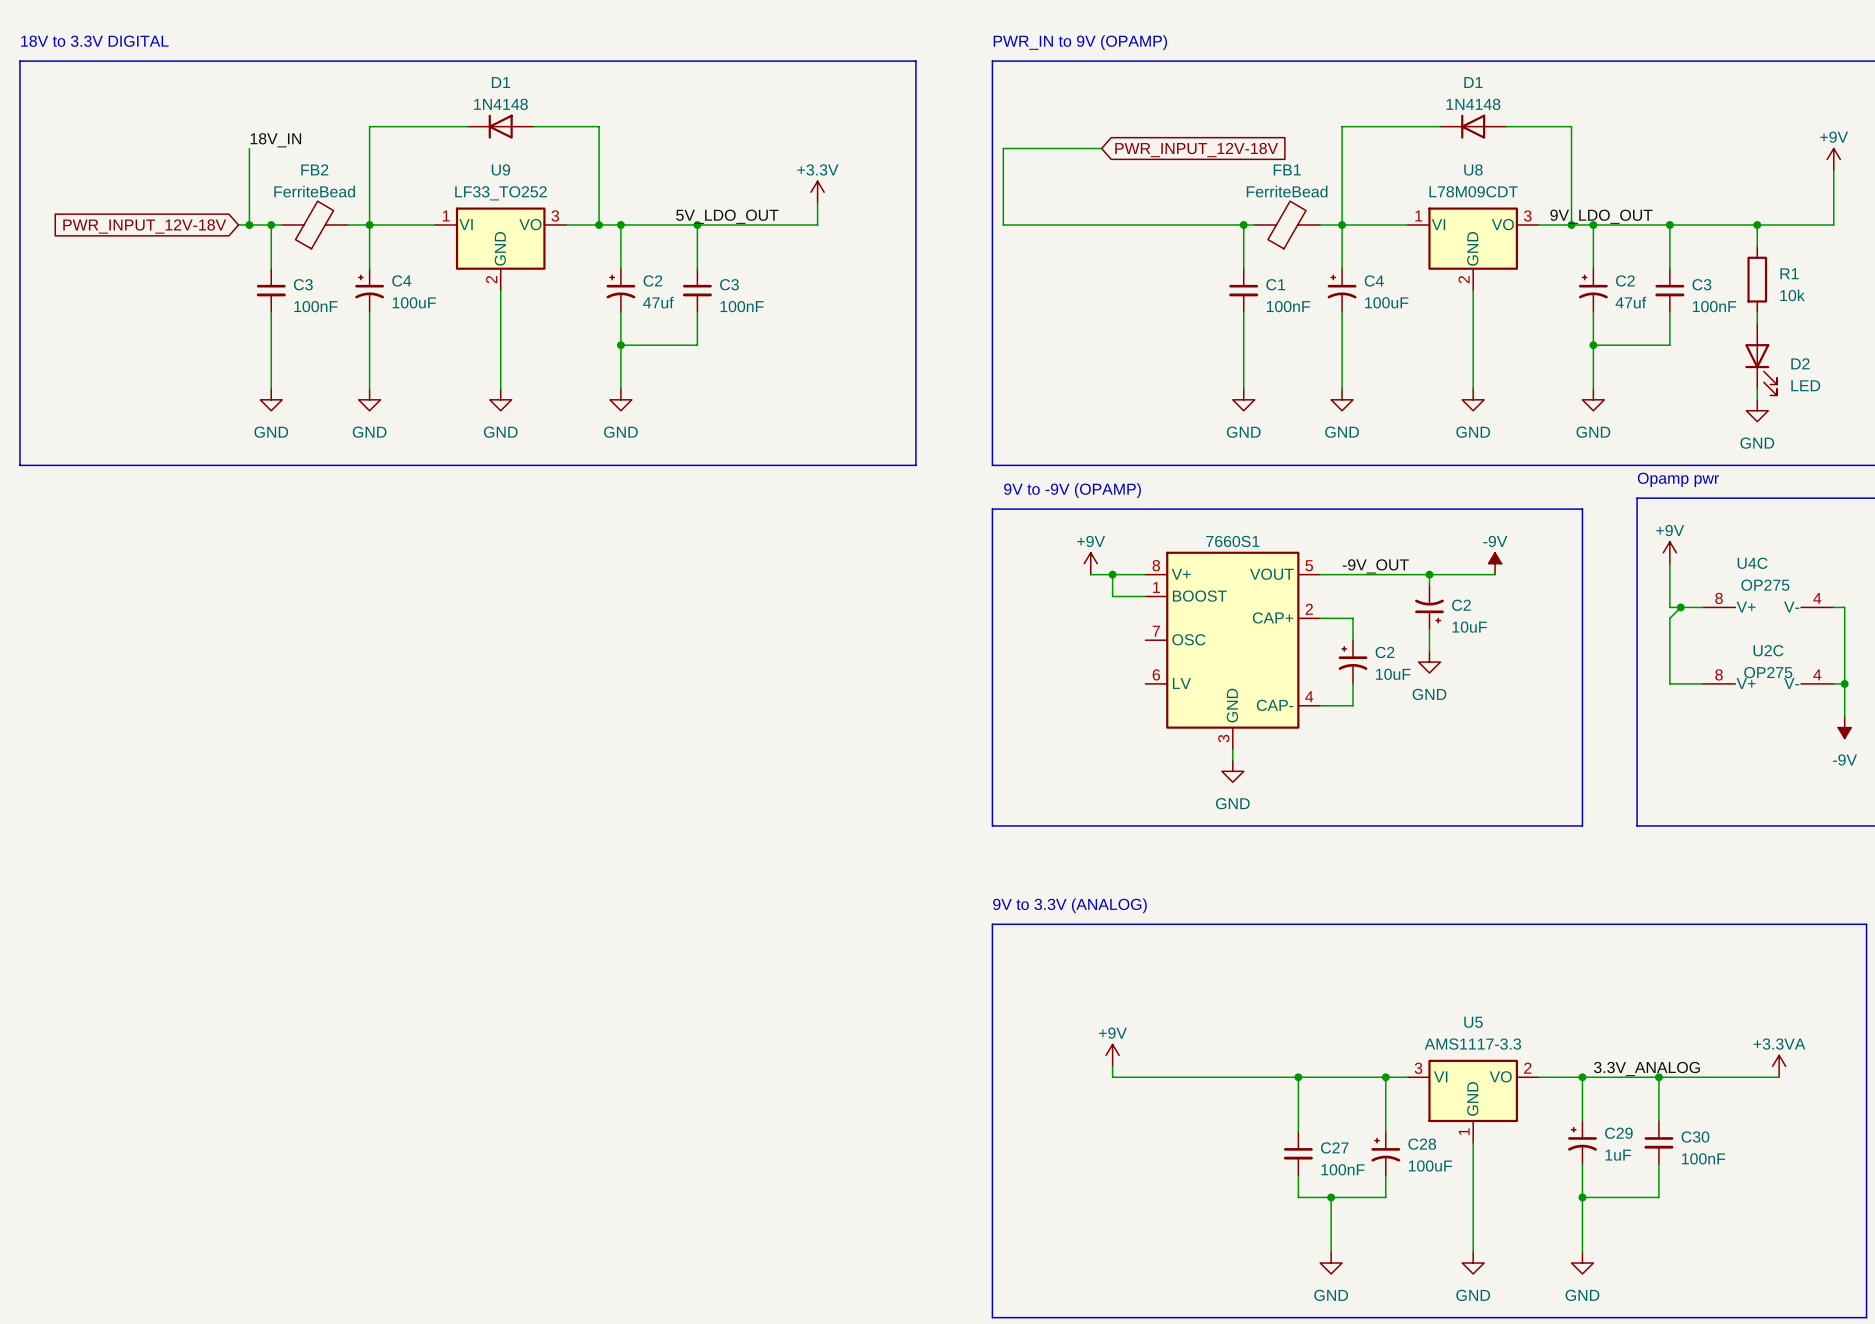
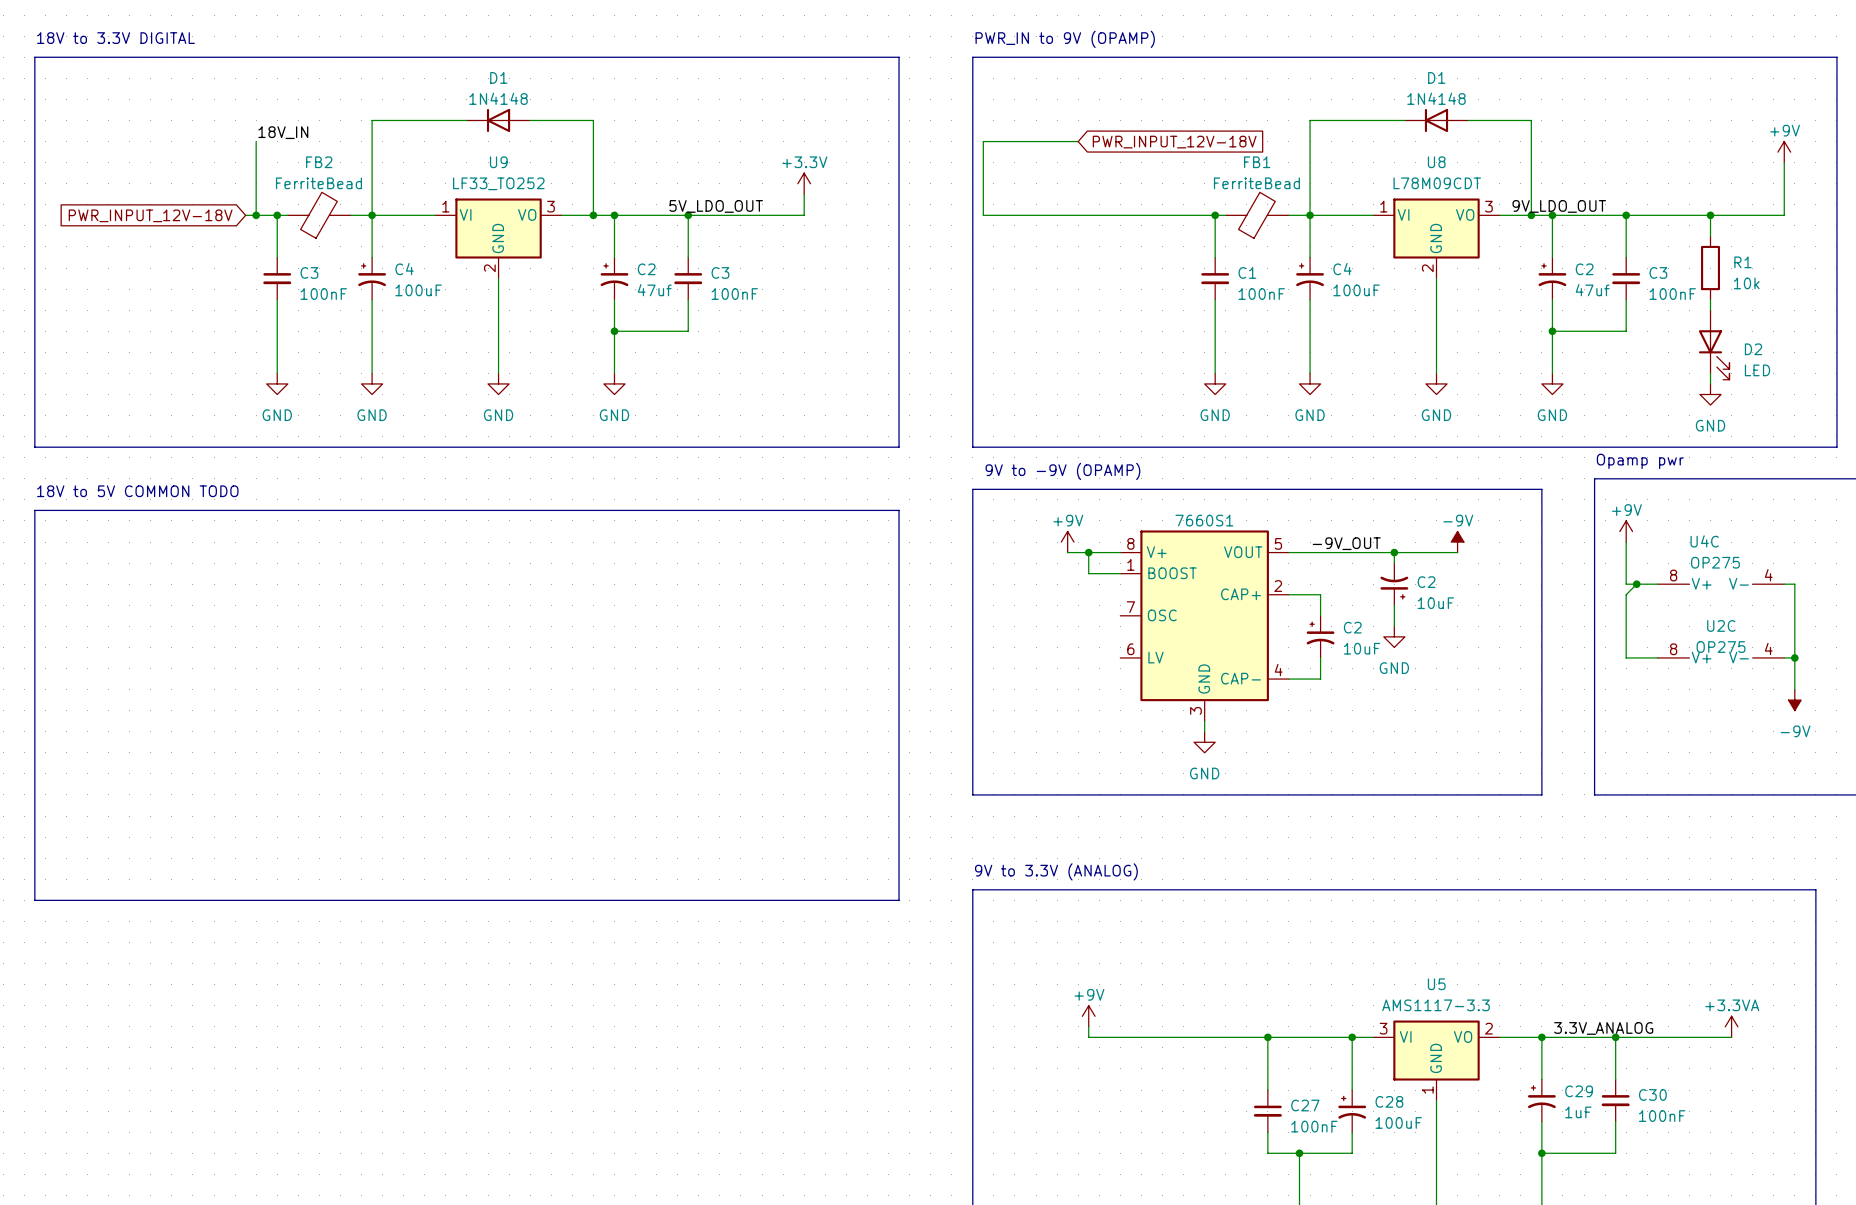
text: none -> 18V to 5V COMMON TODO (137, 491)
line: none -> (34, 510) (899, 510) (899, 900) (34, 900) (34, 510)

